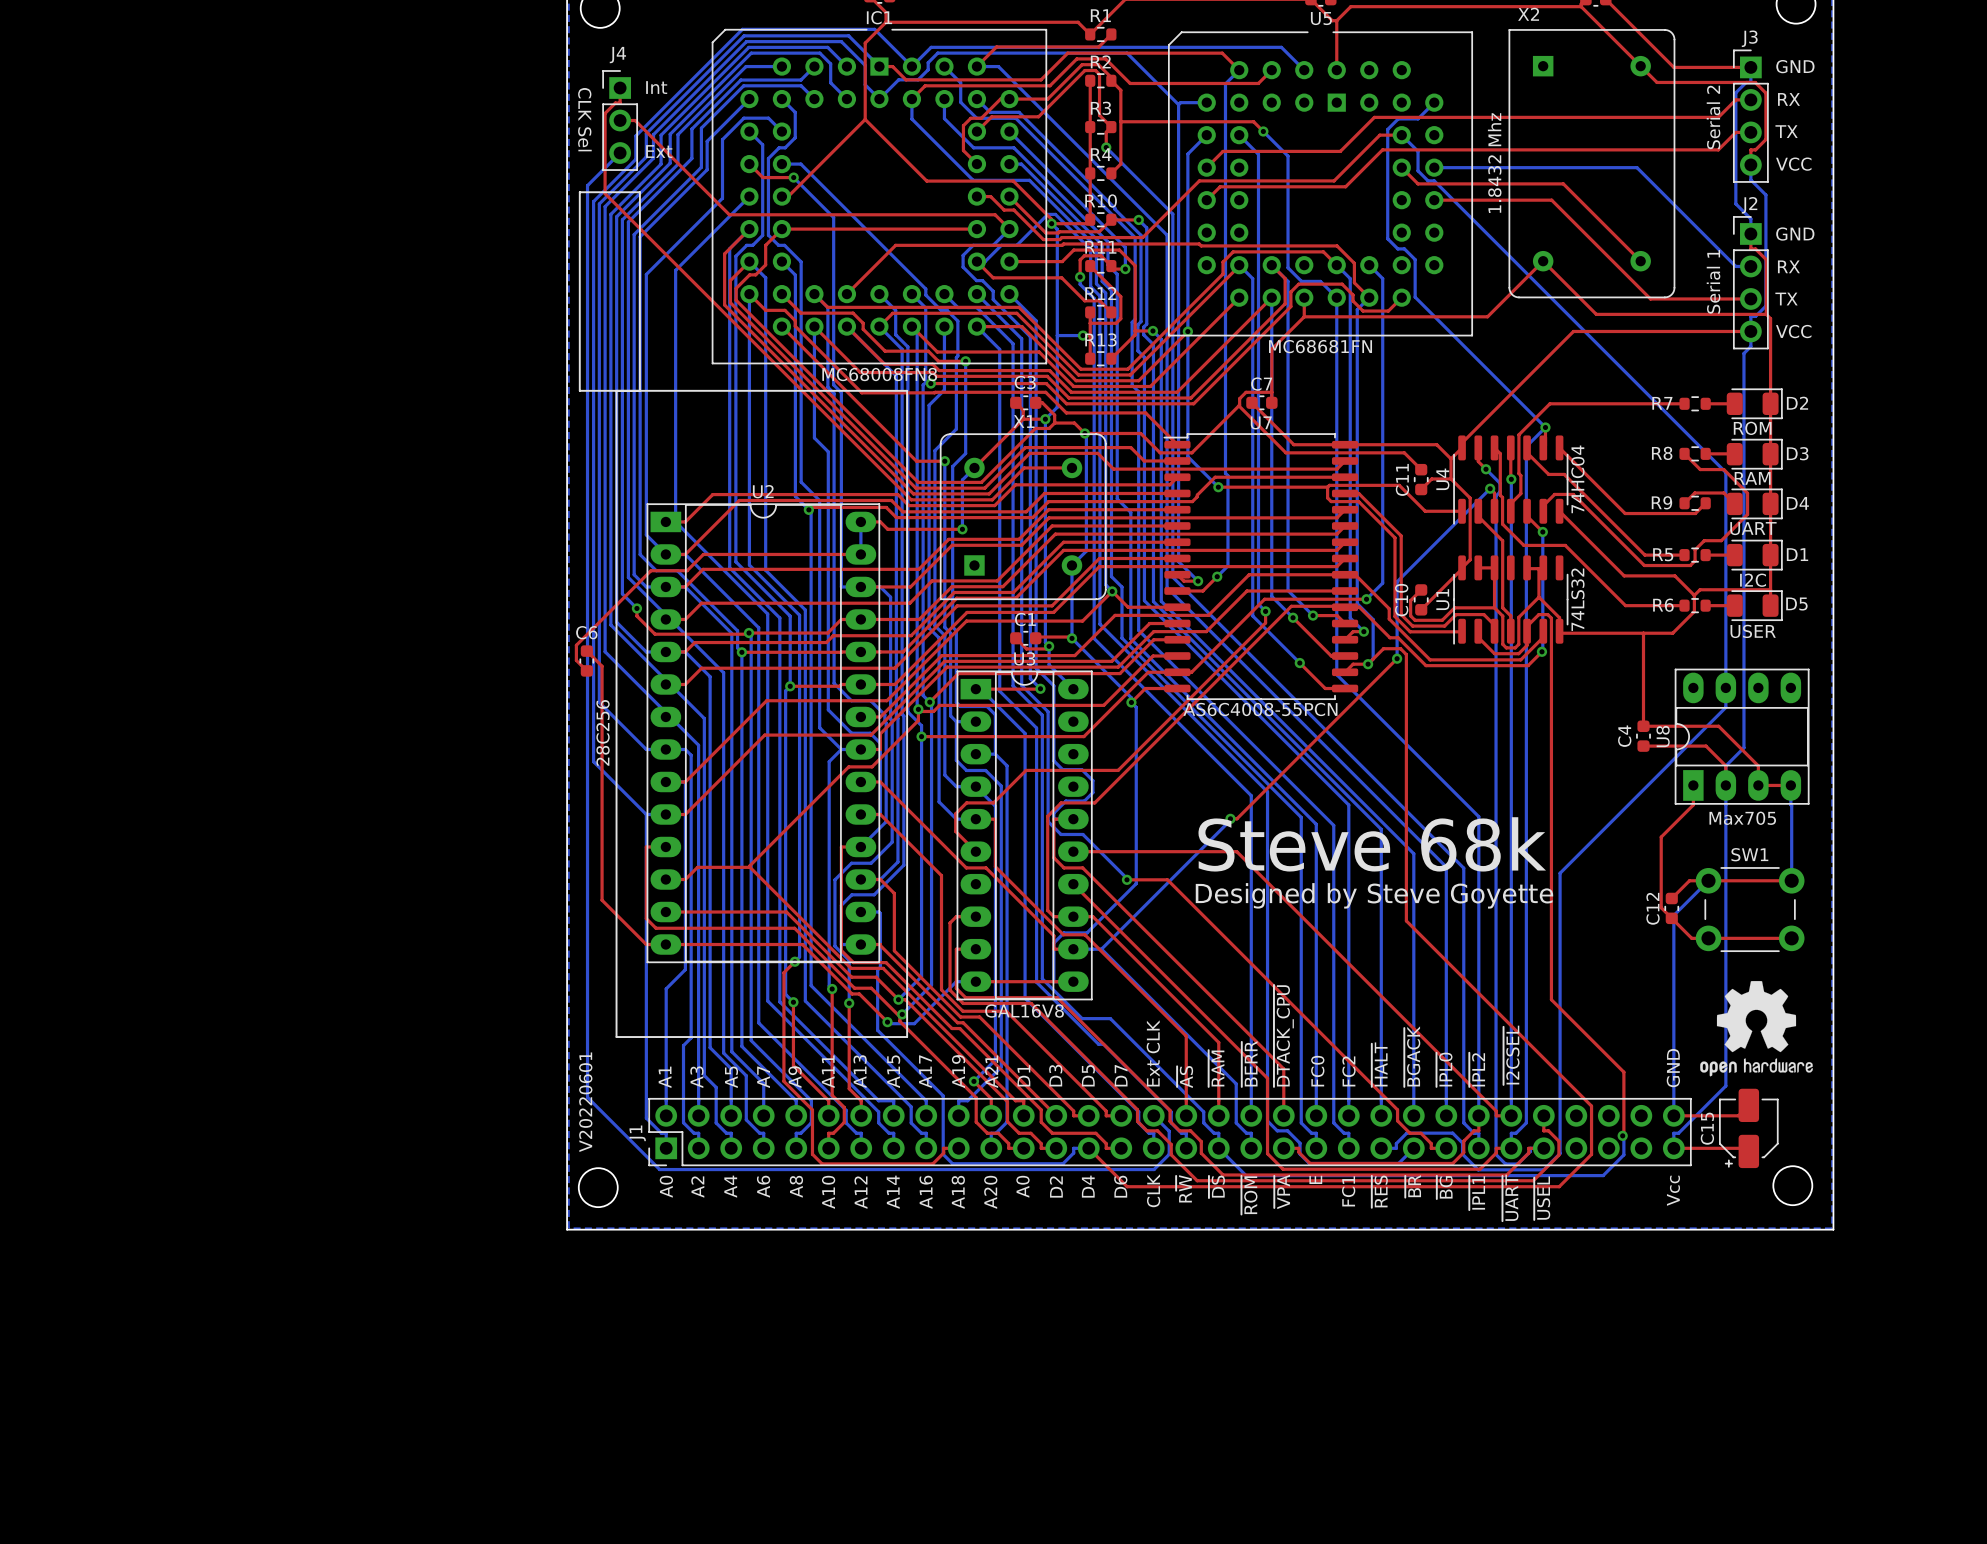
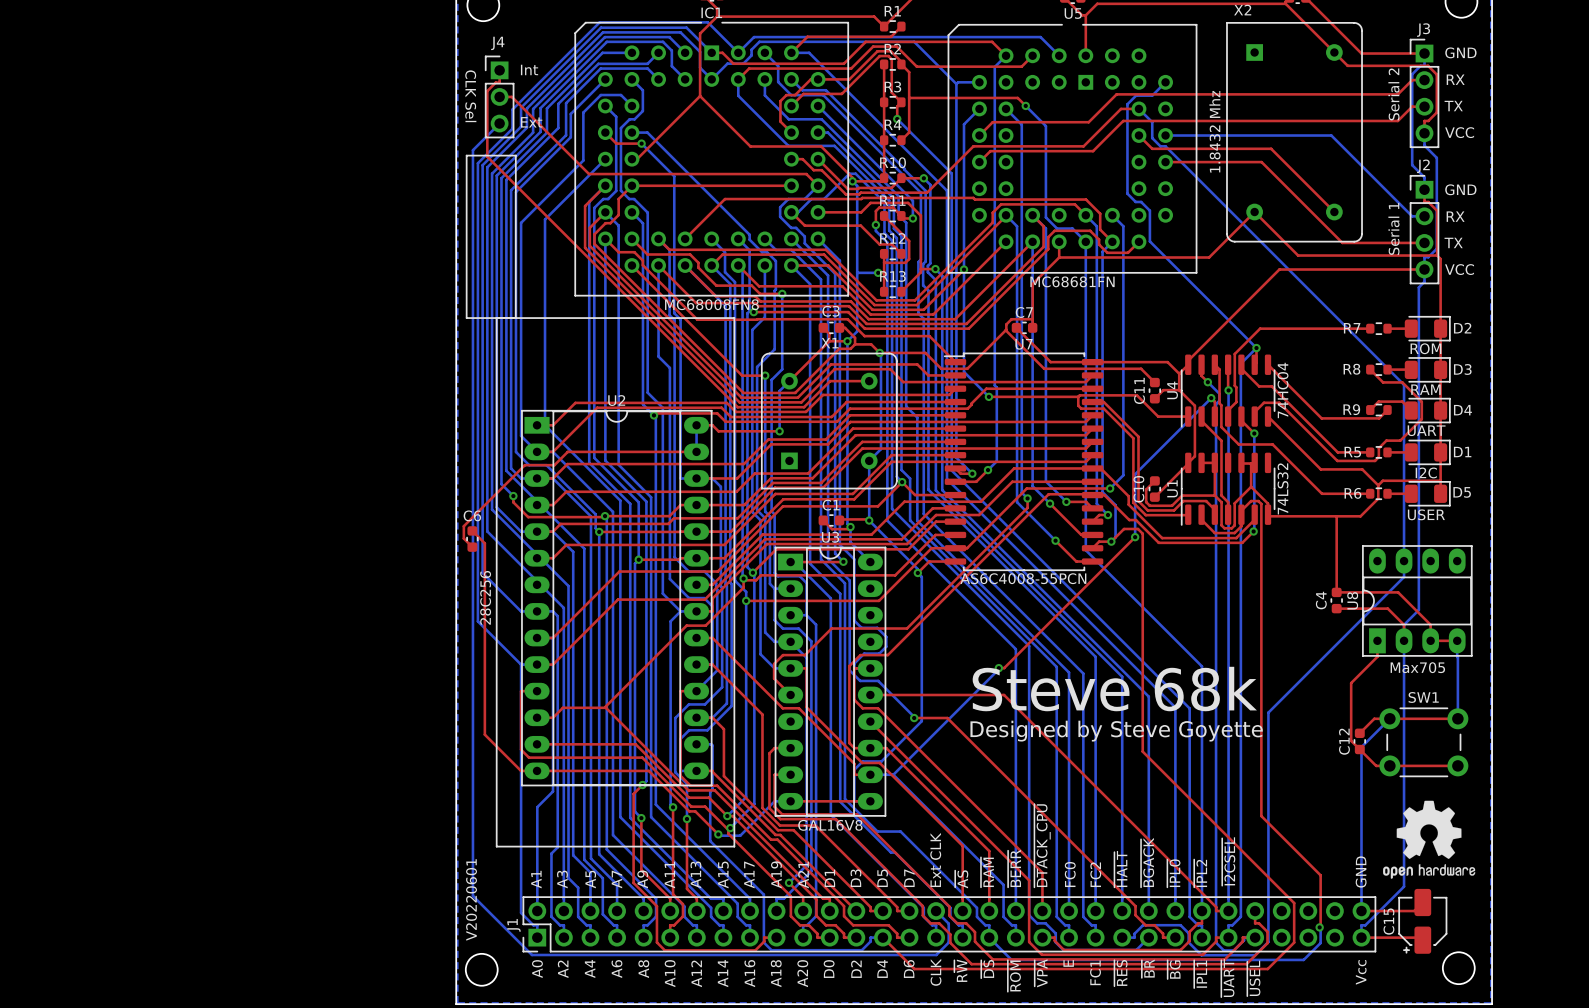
text: A0 (1022, 1186) -> D0 (829, 969)

